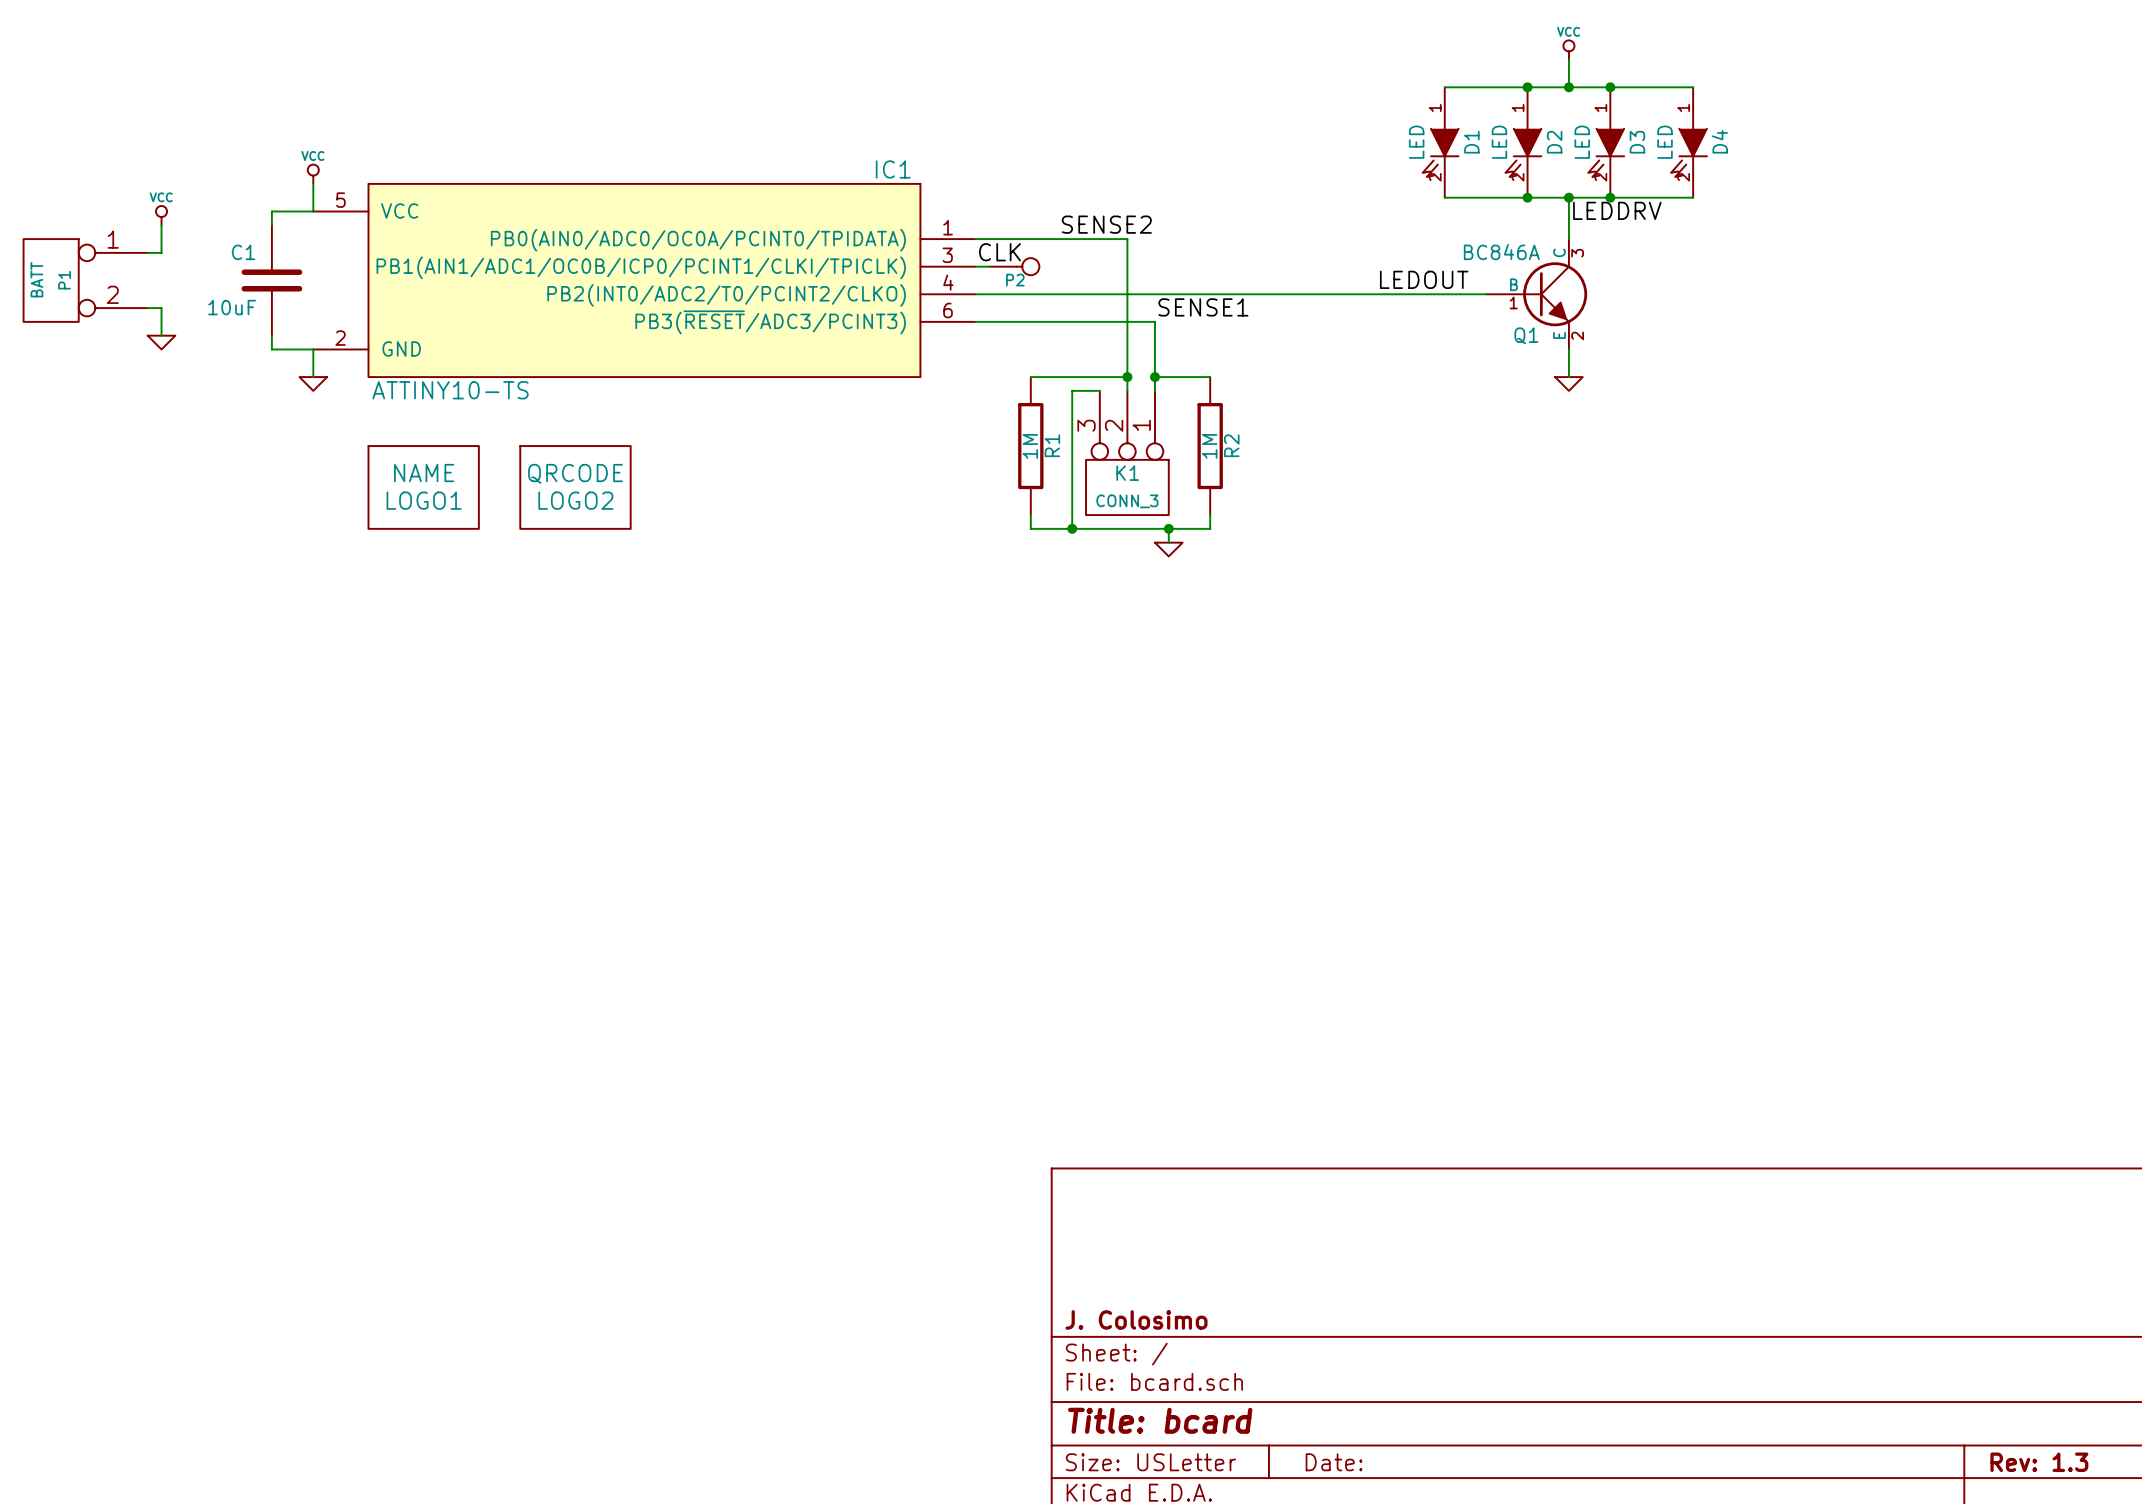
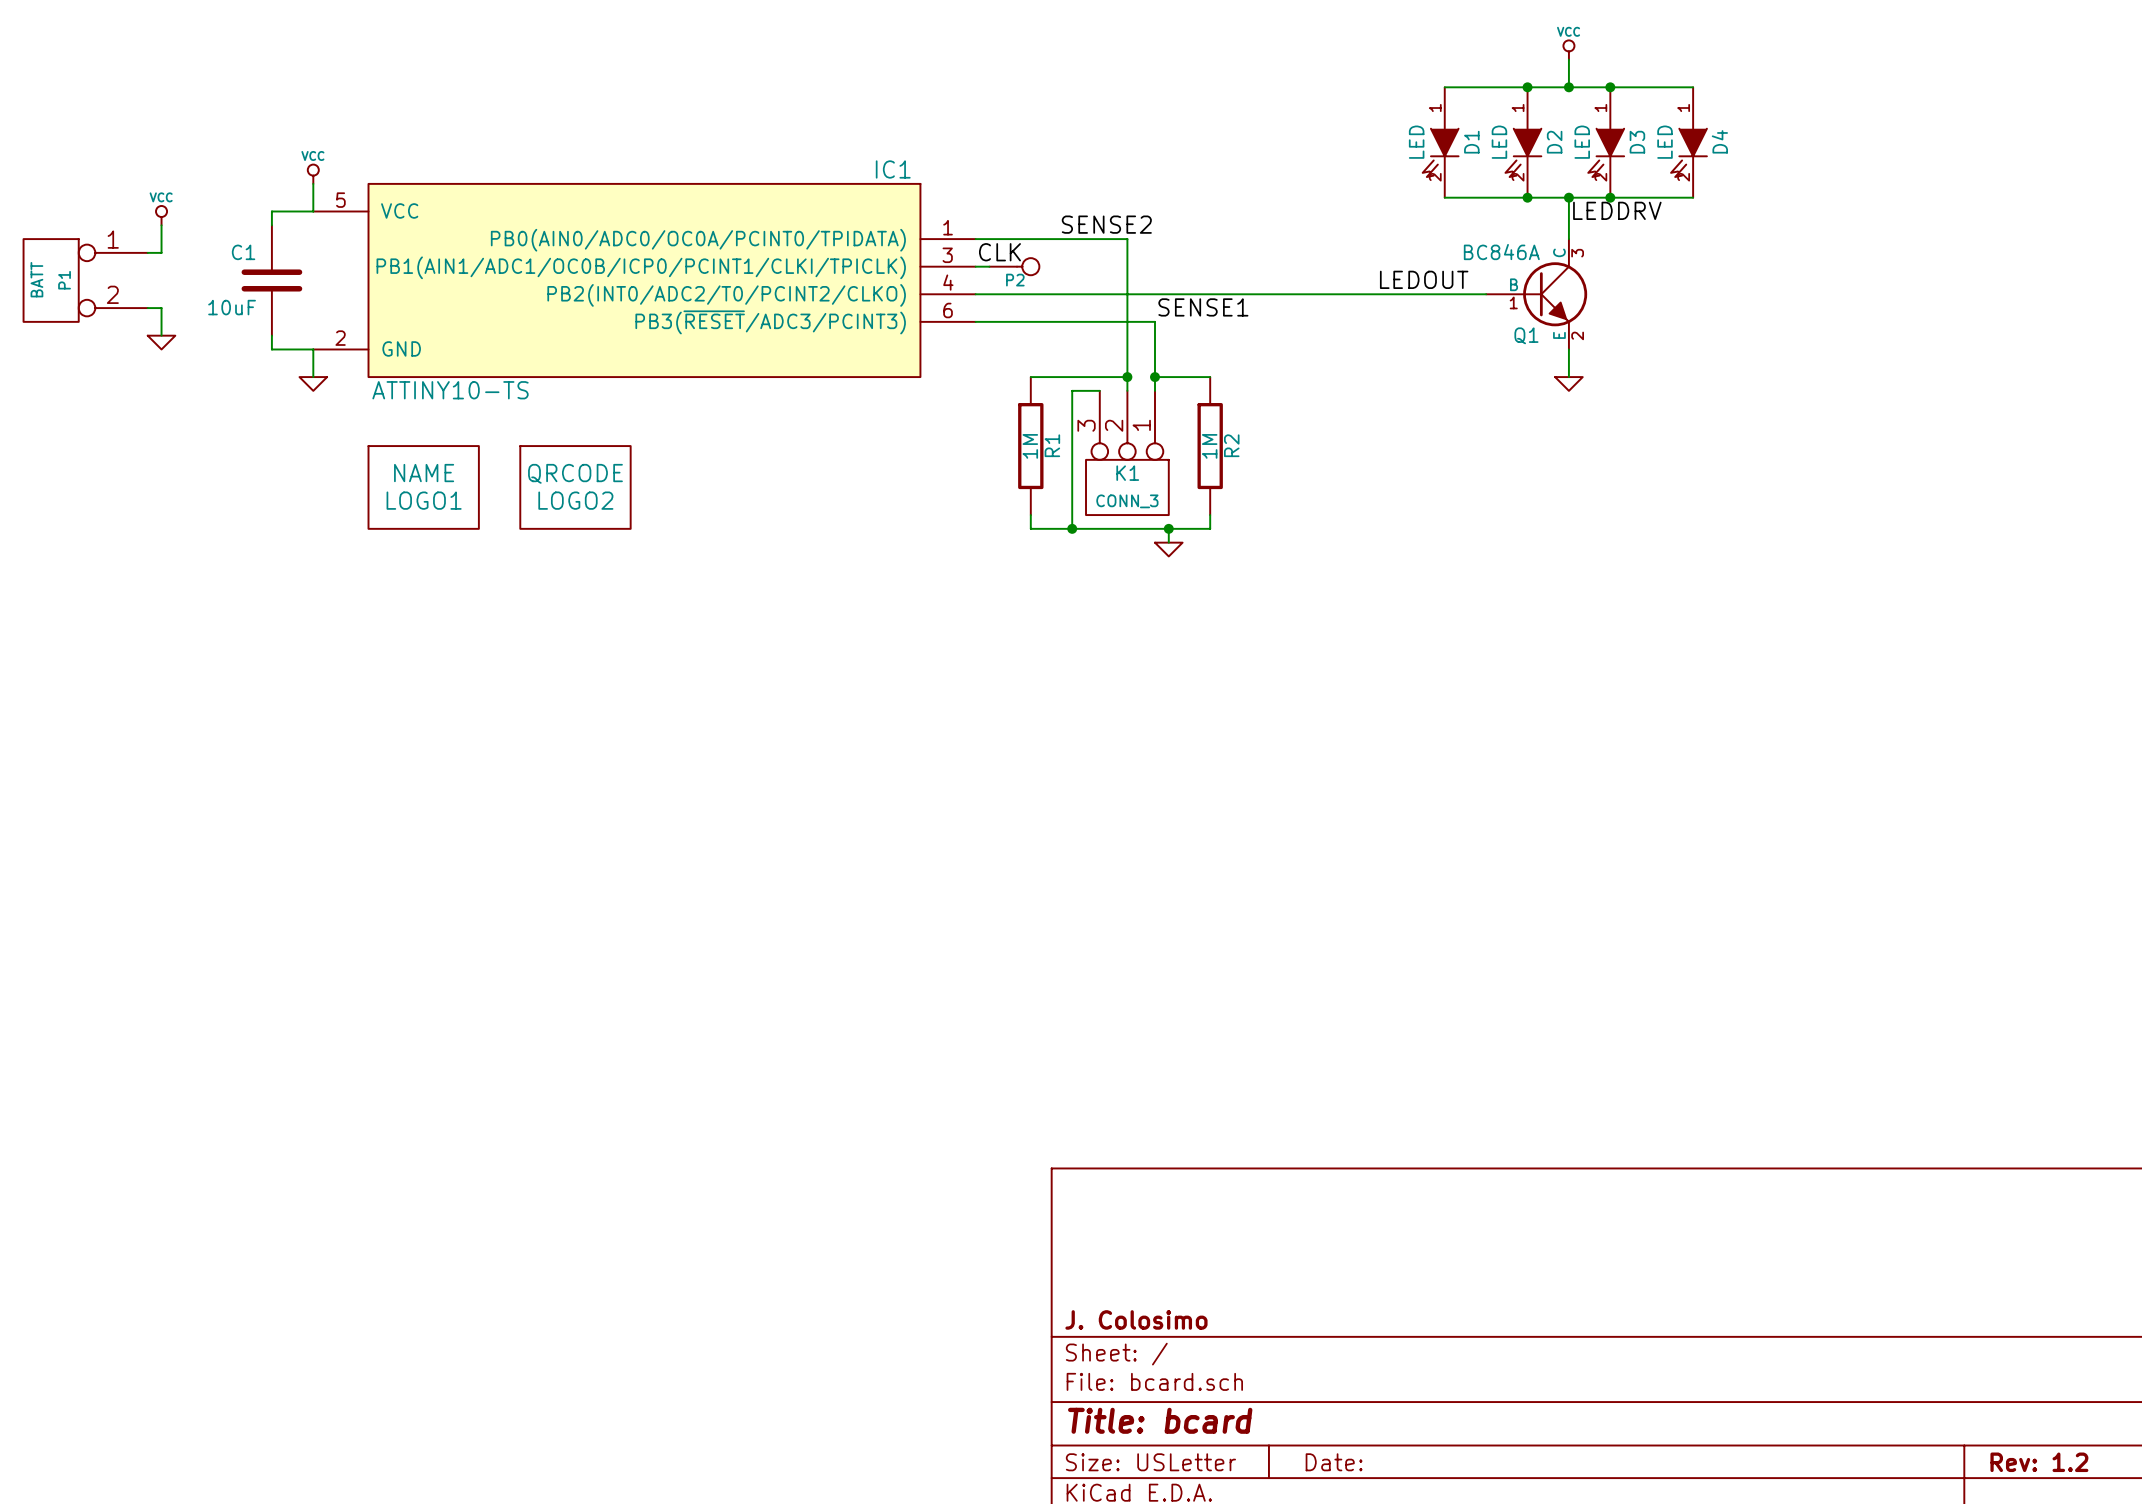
title block: Rev: 1.3 (2039, 1462) -> Rev: 1.2 (2039, 1462)

